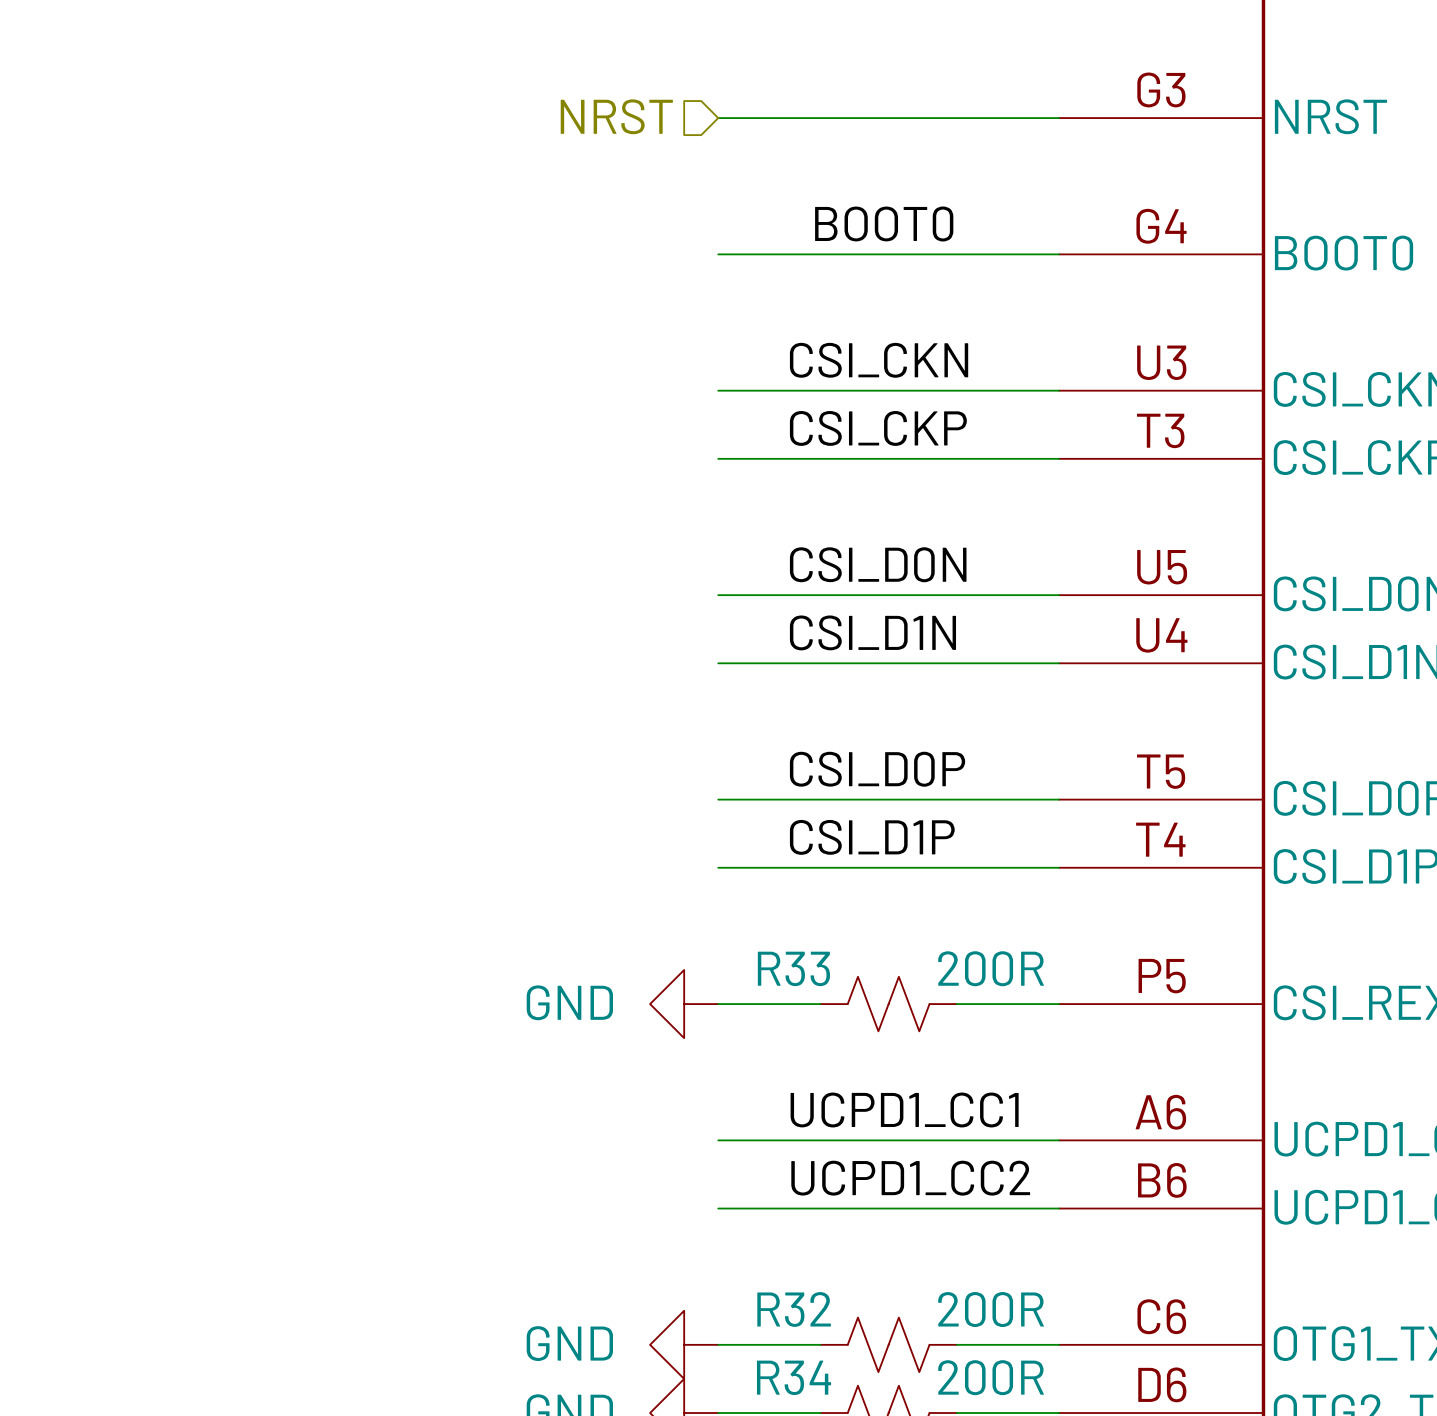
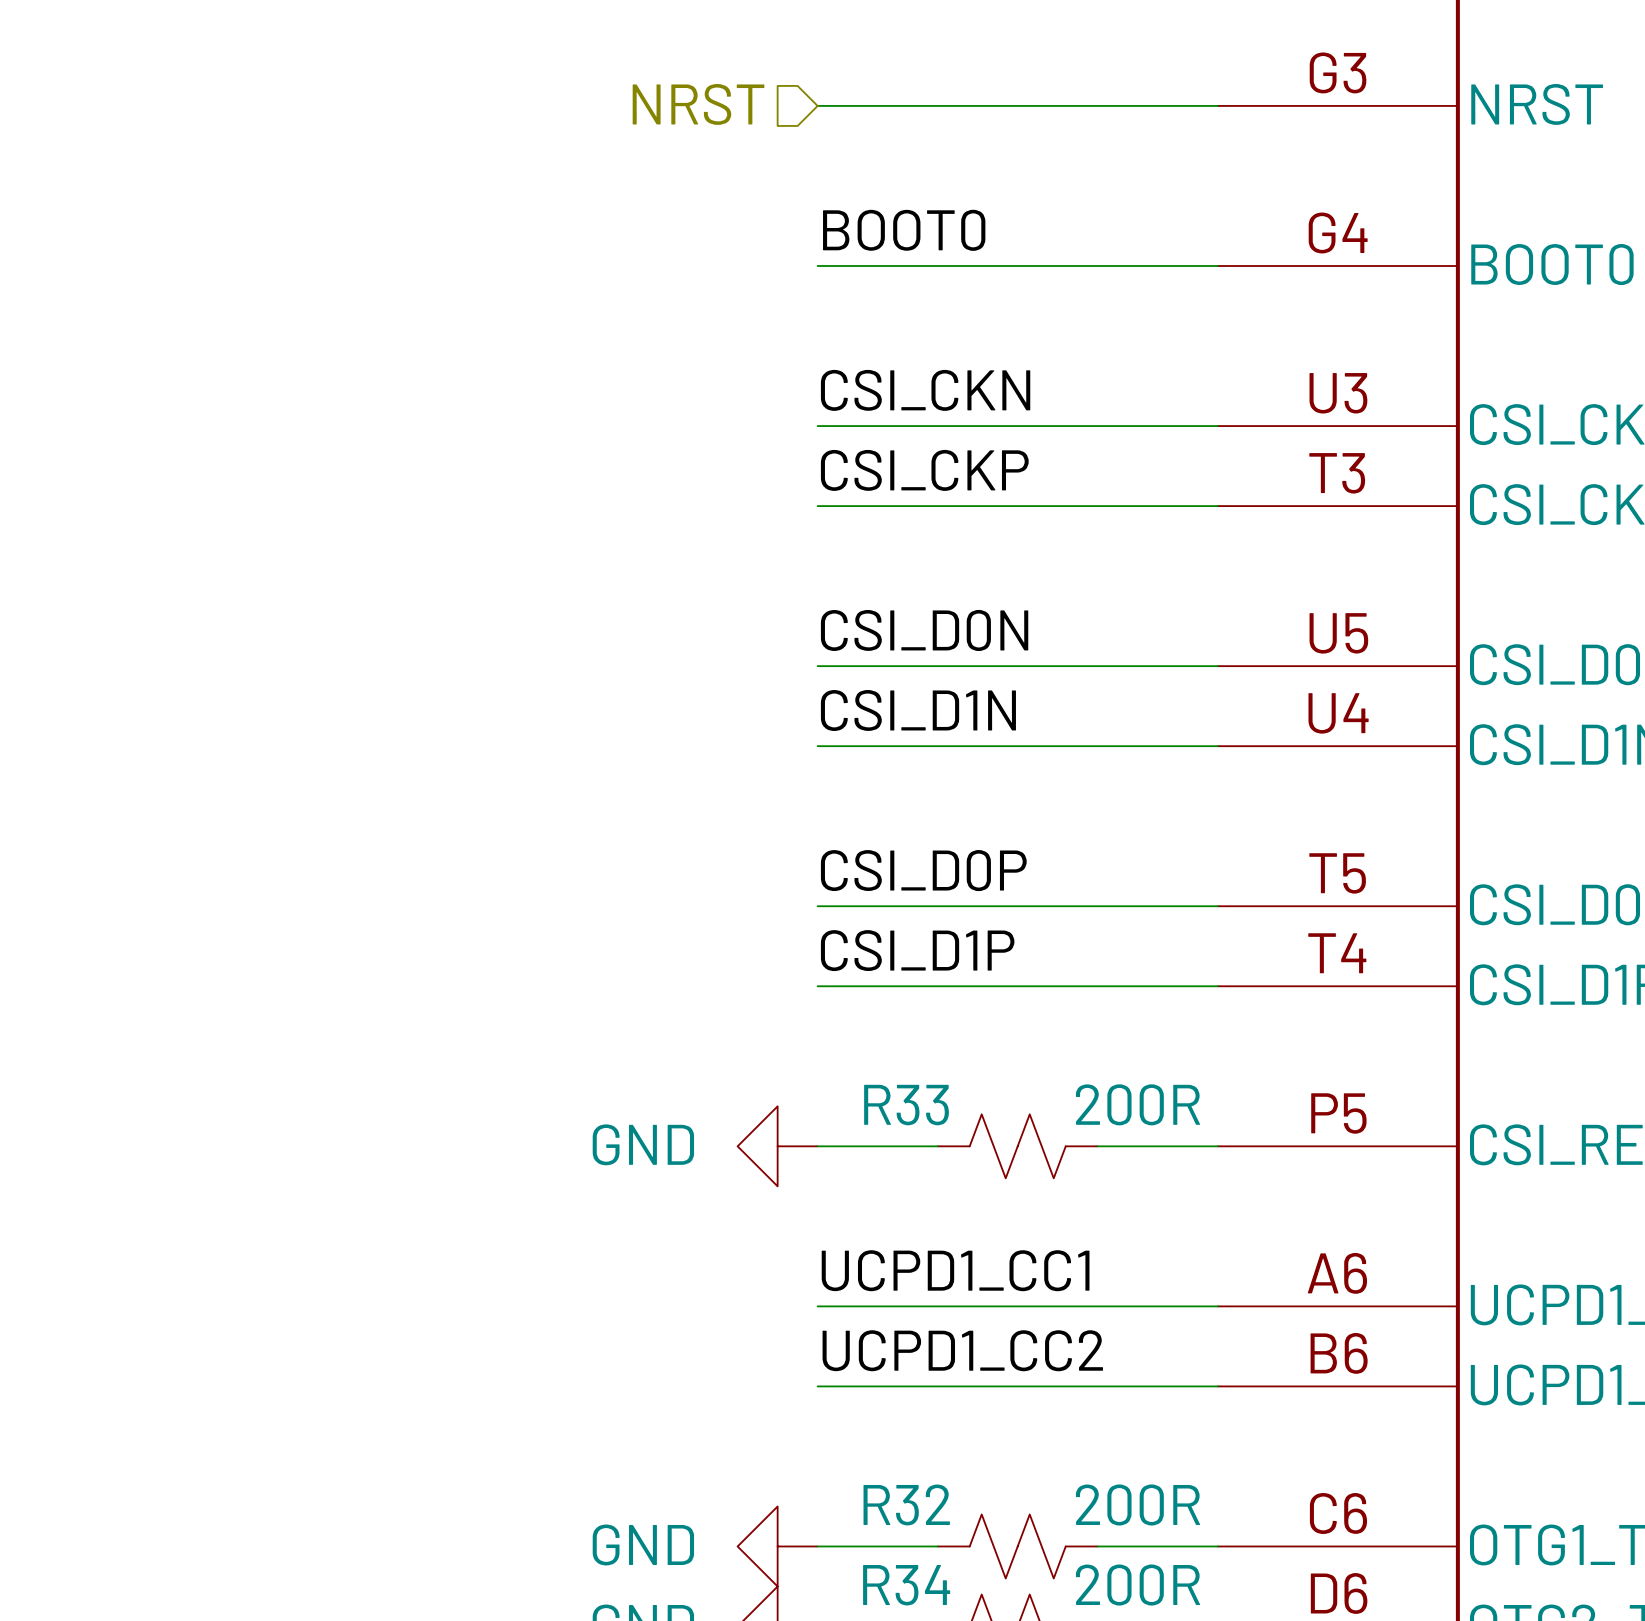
label position: BOOT0 (884, 223) -> BOOT0 (904, 230)
label position: CSI_CKN (879, 360) -> CSI_CKN (925, 390)
label position: CSI_CKP (878, 428) -> CSI_CKP (924, 470)
label position: CSI_D0N (878, 564) -> CSI_D0N (924, 630)
label position: CSI_D1N (872, 632) -> CSI_D1N (918, 710)
label position: CSI_D0P (877, 769) -> CSI_D0P (923, 870)
label position: CSI_D1P (872, 837) -> CSI_D1P (917, 950)
label position: UCPD1_CC1 (904, 1110) -> UCPD1_CC1 (955, 1270)
label position: UCPD1_CC2 (910, 1178) -> UCPD1_CC2 (962, 1350)

